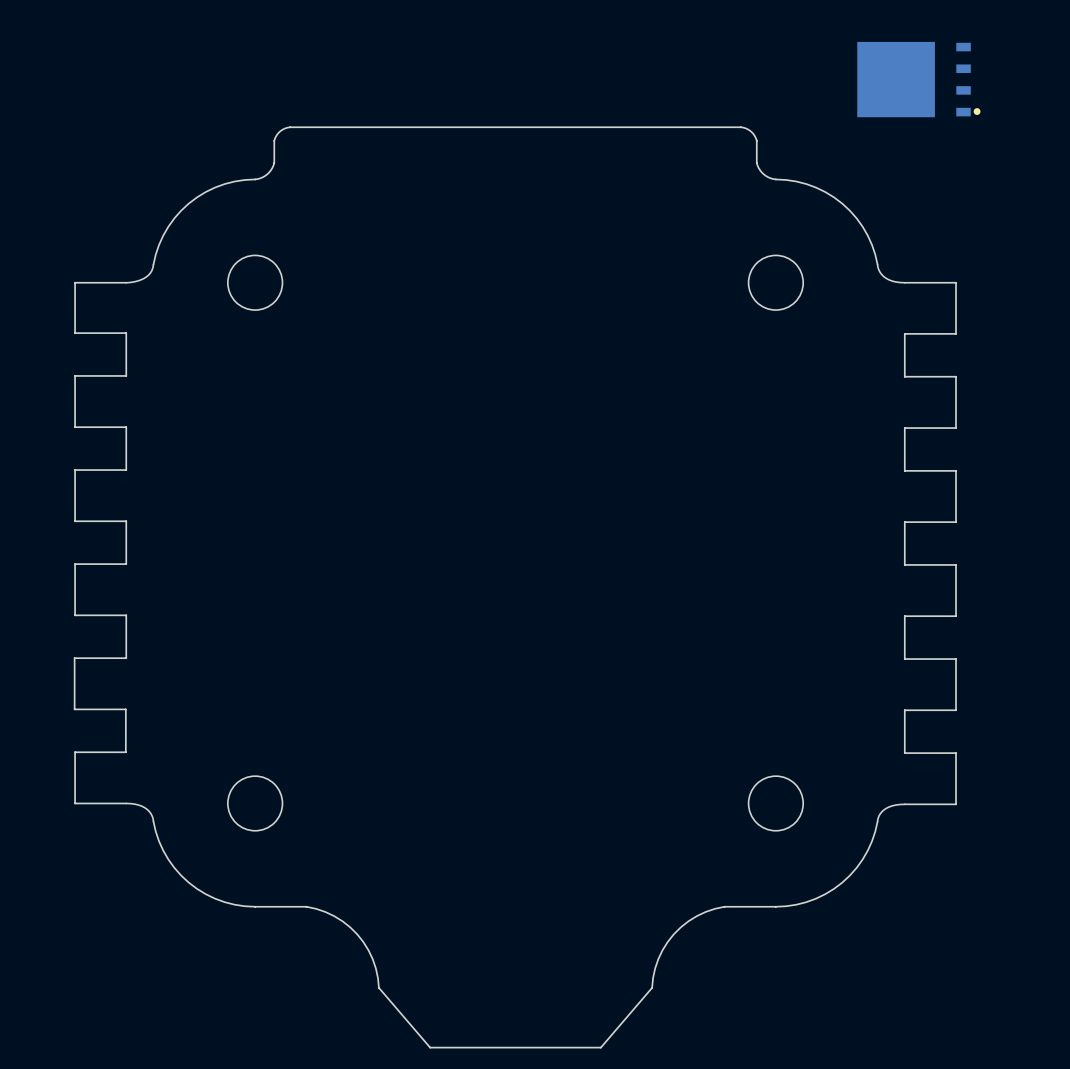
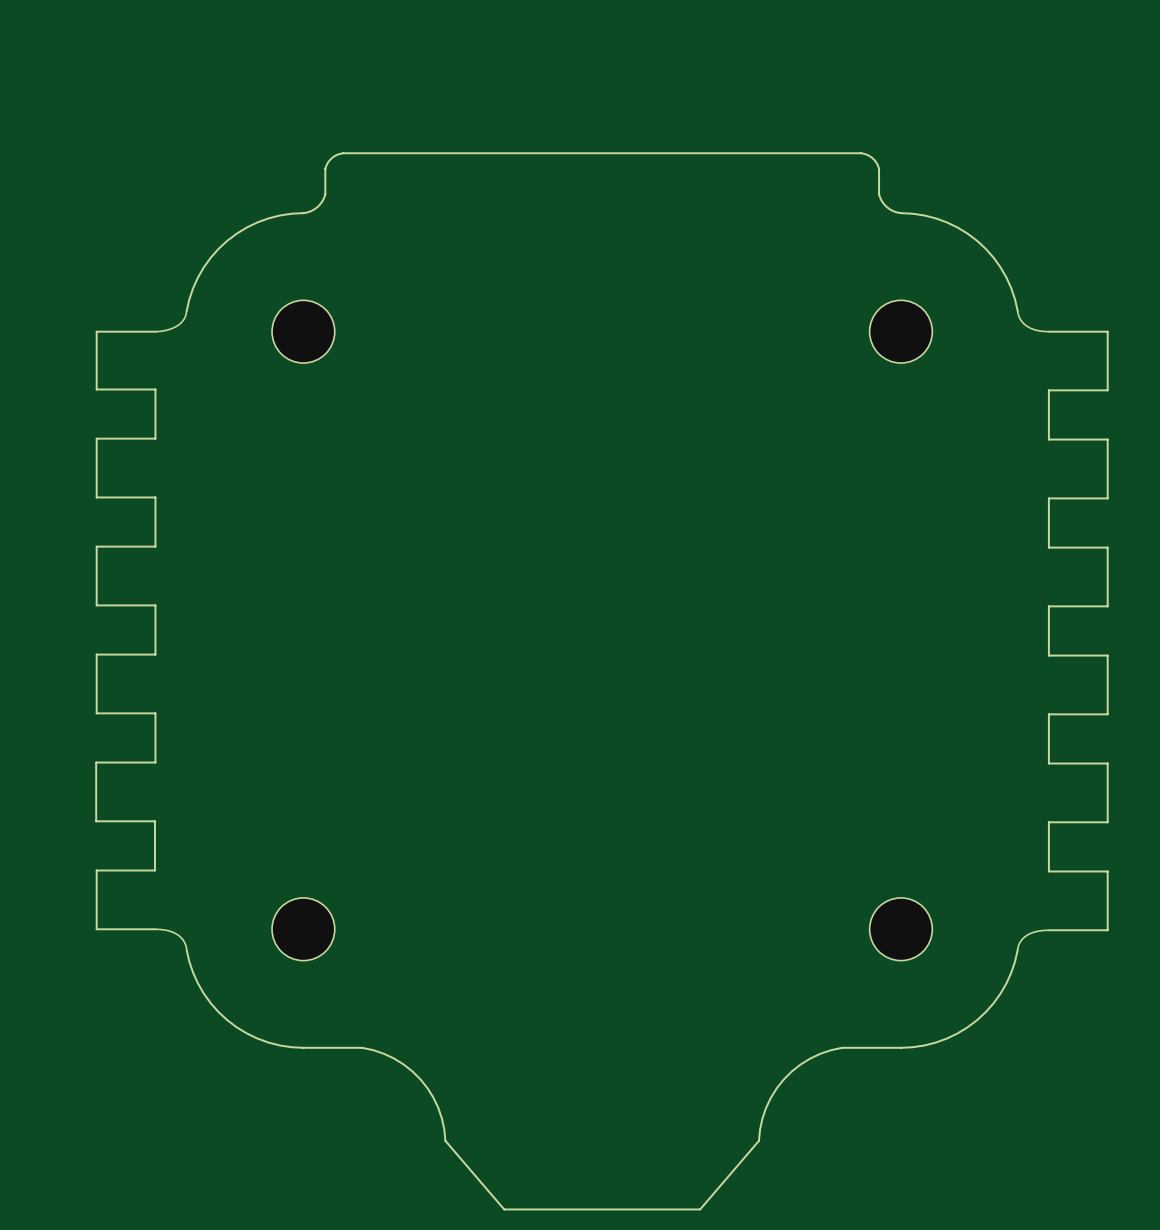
part: (918, 79) -> none

